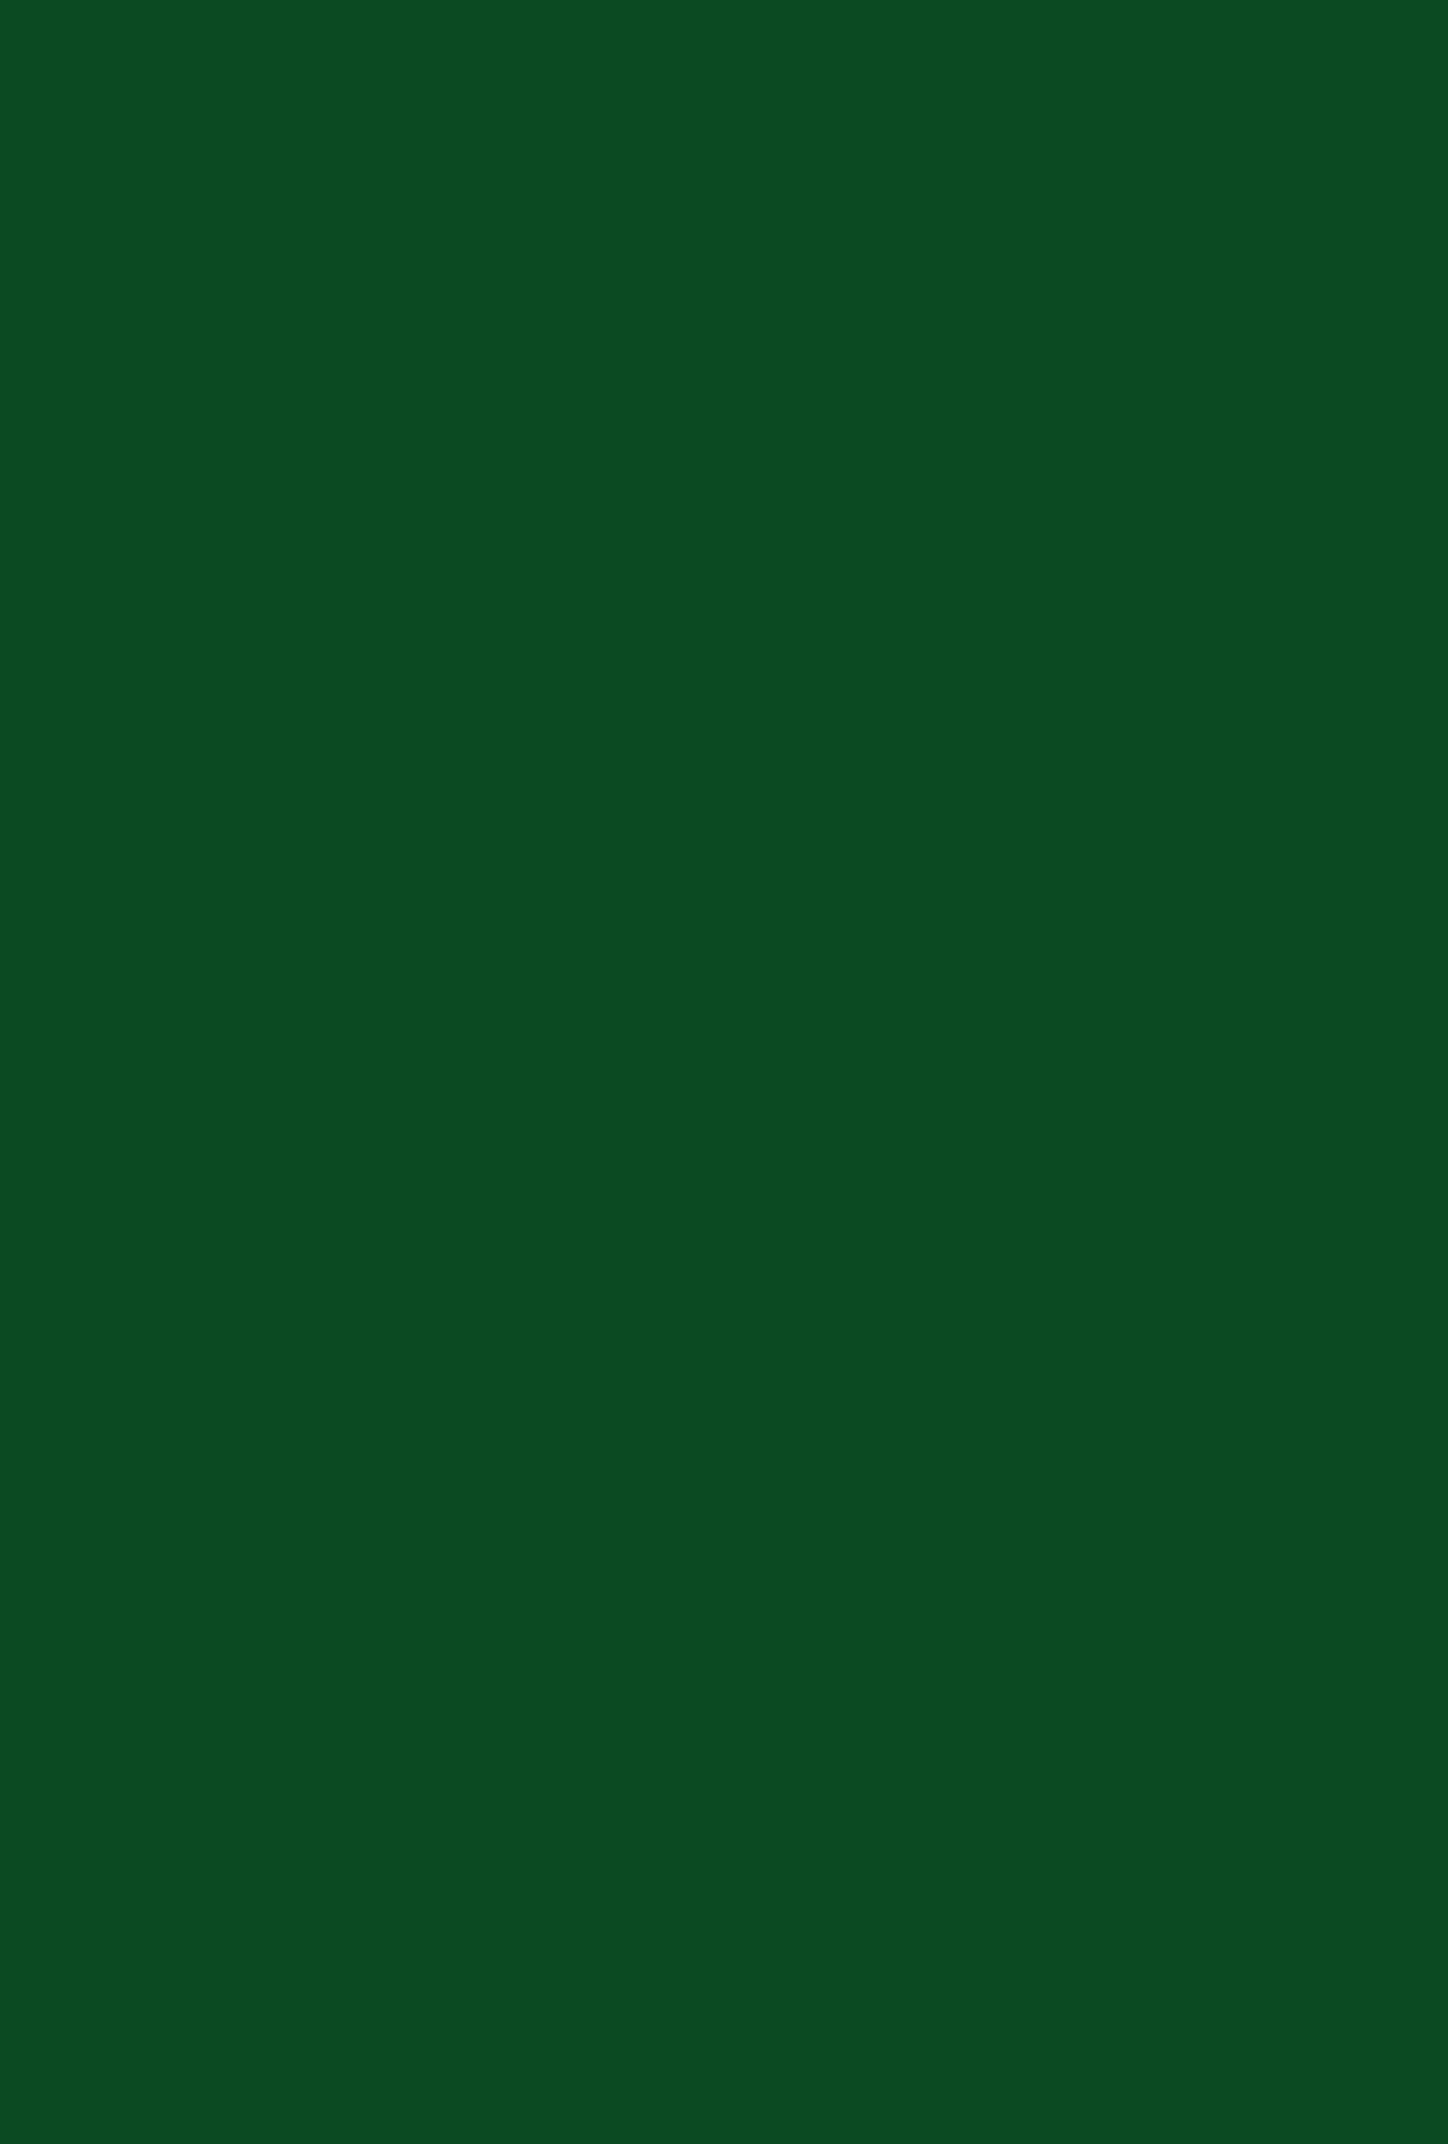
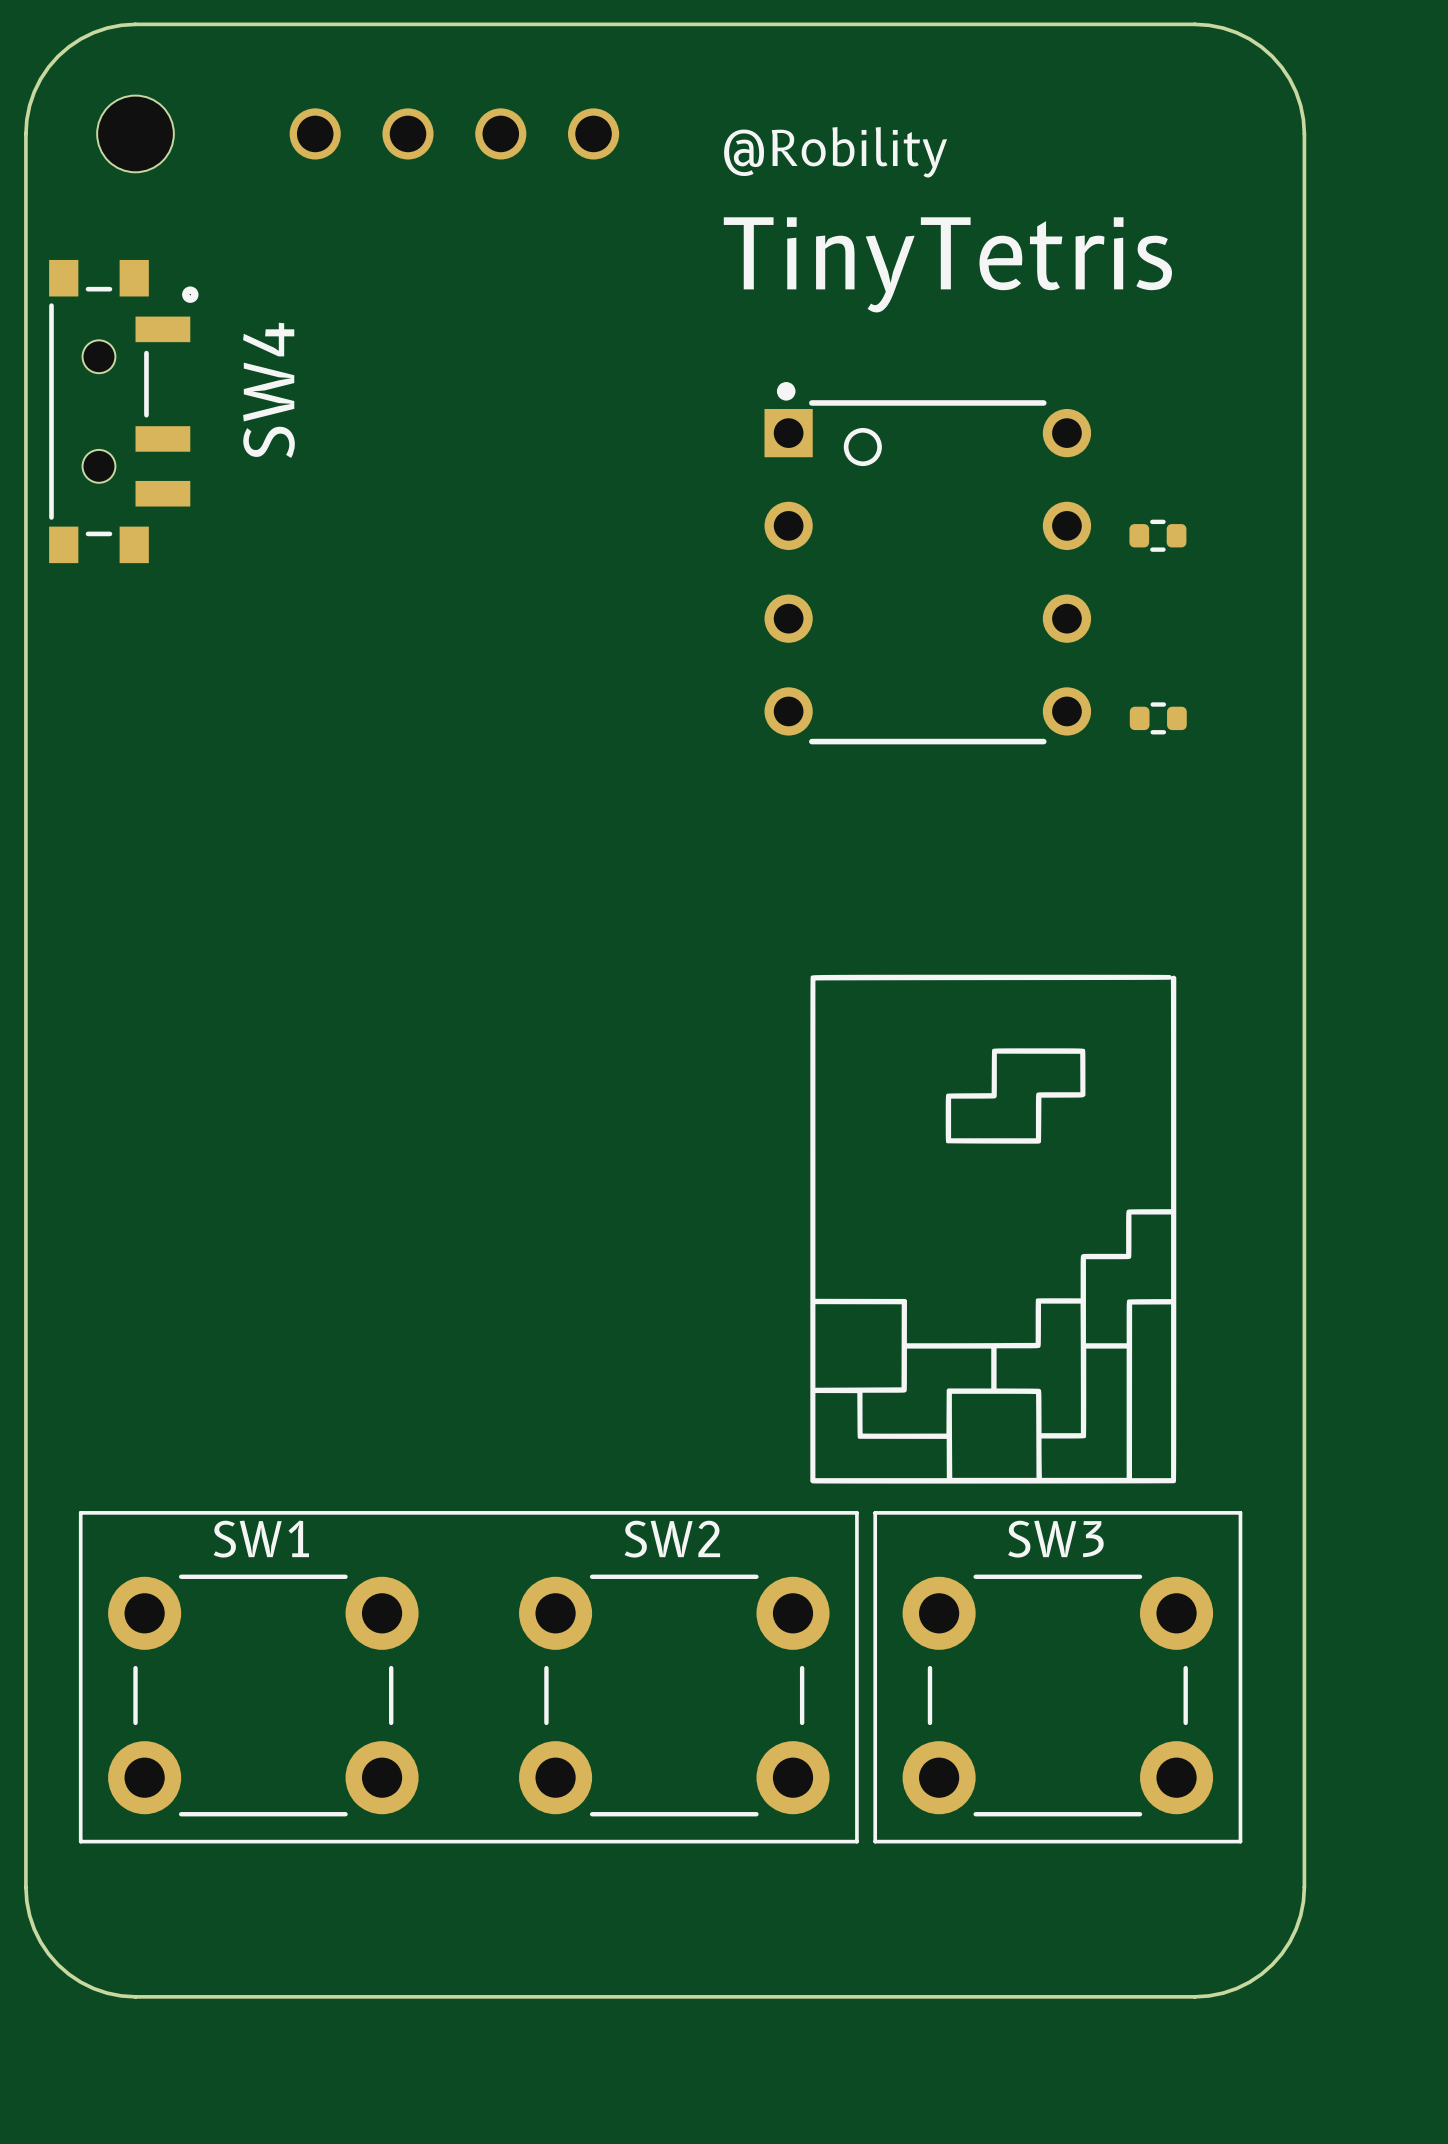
board edge: none -> (135, 24) (1194, 24) (1223, 28) (1249, 39) (1272, 56) (1289, 79) (1300, 105) (1304, 133) (1304, 1887) (1300, 1915) (1289, 1942) (1272, 1964) (1249, 1982) (1223, 1993) (1194, 1996) (135, 1996) (107, 1993) (80, 1982) (58, 1964) (40, 1942) (29, 1915) (25, 1887) (25, 133) (26, 119) (34, 92) (48, 67) (58, 56) (80, 39) (93, 32) (107, 28) (135, 24)
part: none -> (135, 133)
part: none -> (454, 133)
text: none -> @Robility (835, 152)
text: none -> TinyTetris (947, 264)
SW4: none -> (123, 411)
part: none -> (1157, 535)
part: none -> (927, 563)
part: none -> (1158, 718)
drawing: none -> [810, 974, 1177, 1484]
line: none -> (80, 1512) (856, 1512) (856, 1841) (80, 1841) (80, 1512)
line: none -> (875, 1512) (1240, 1512) (1240, 1841) (875, 1841) (875, 1512)
SW1: none -> (263, 1695)
SW2: none -> (674, 1695)
SW3: none -> (1057, 1695)

